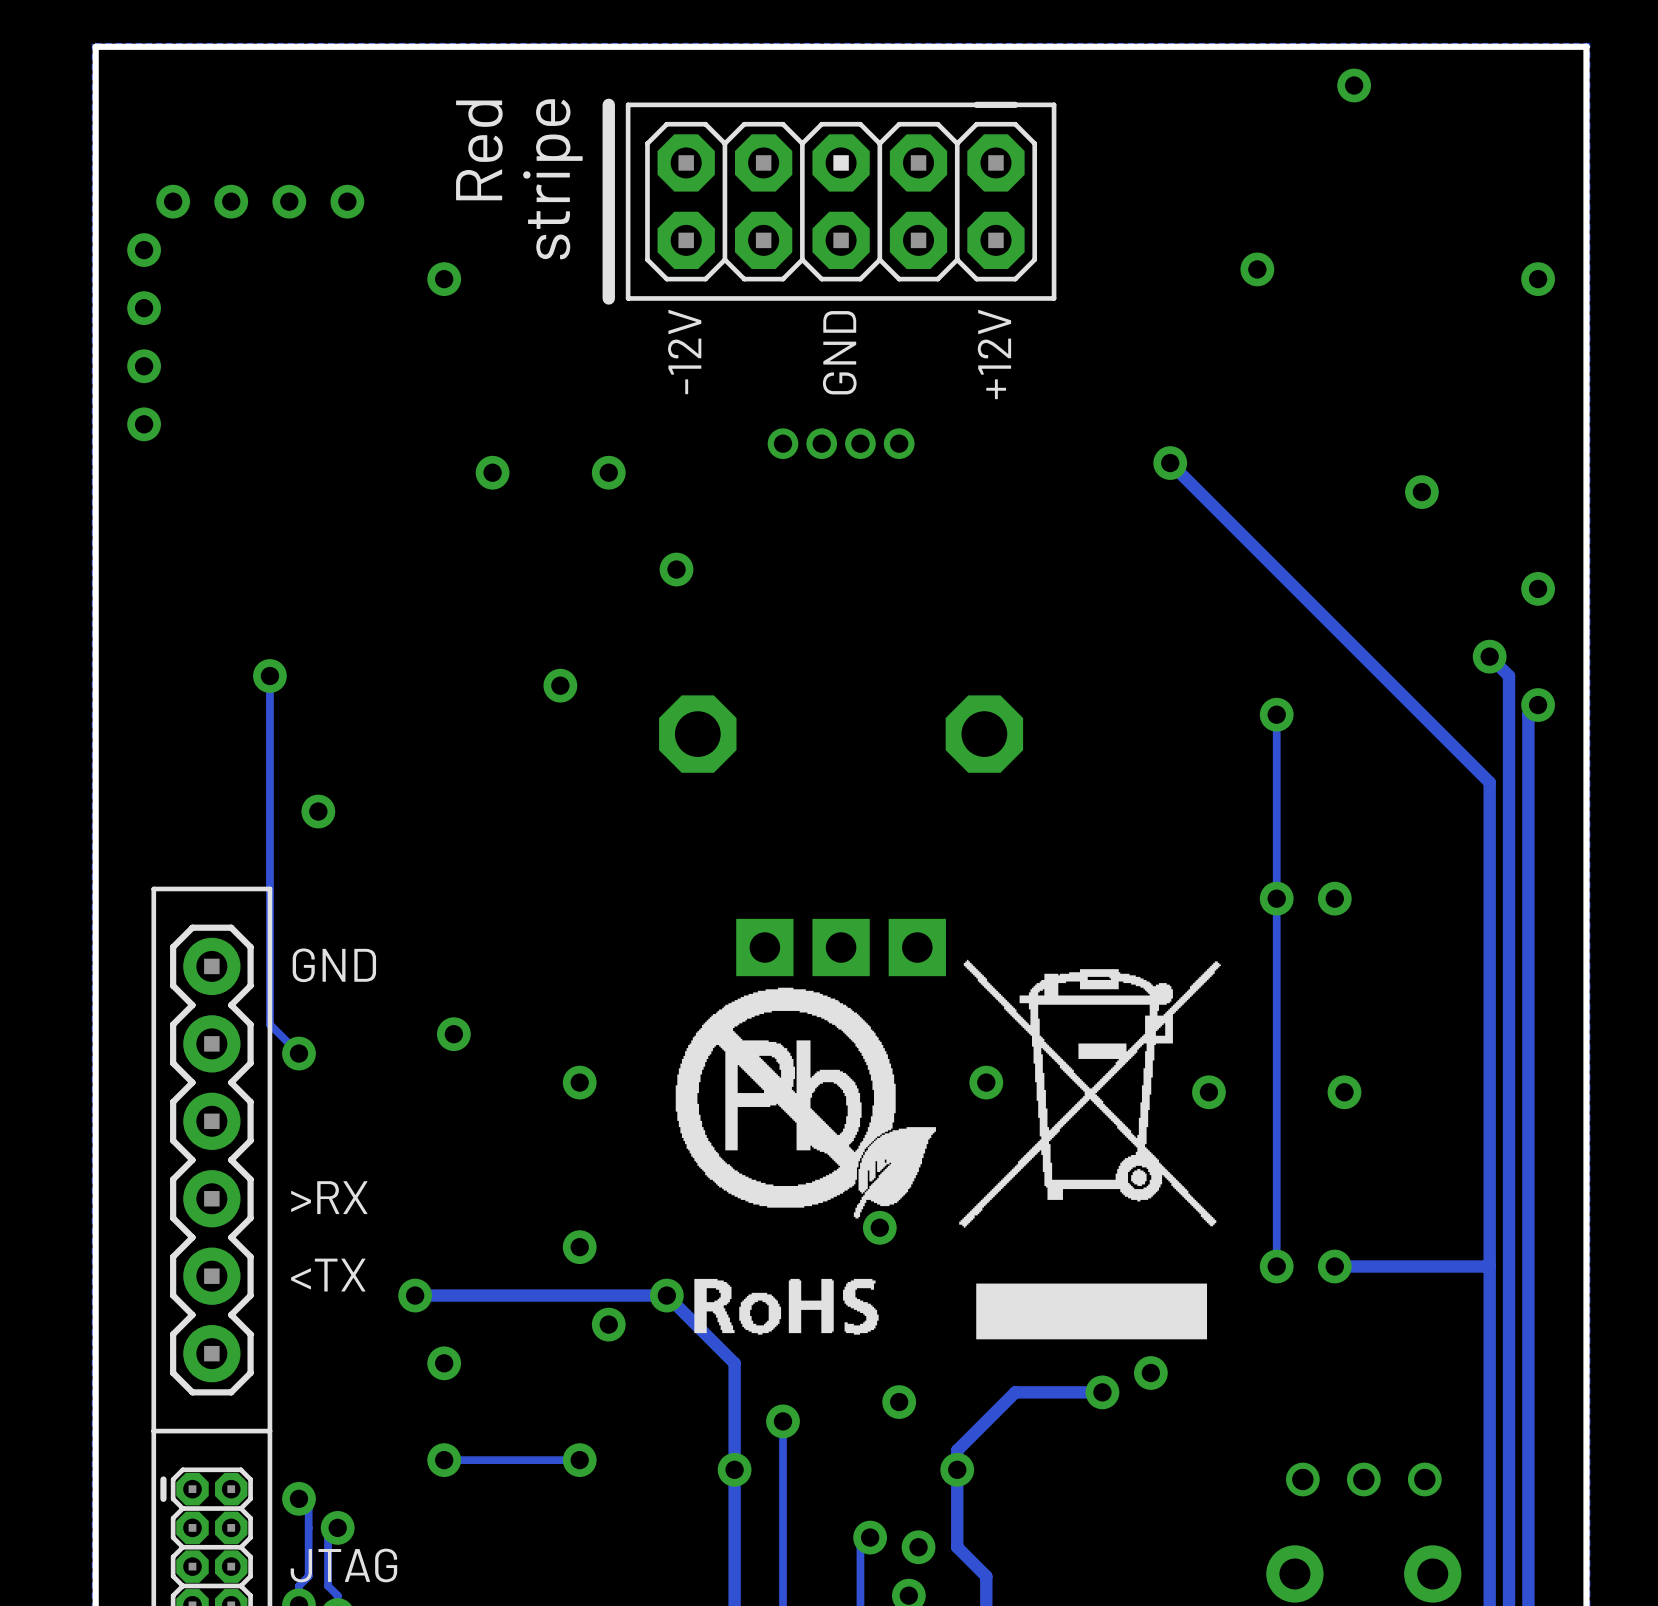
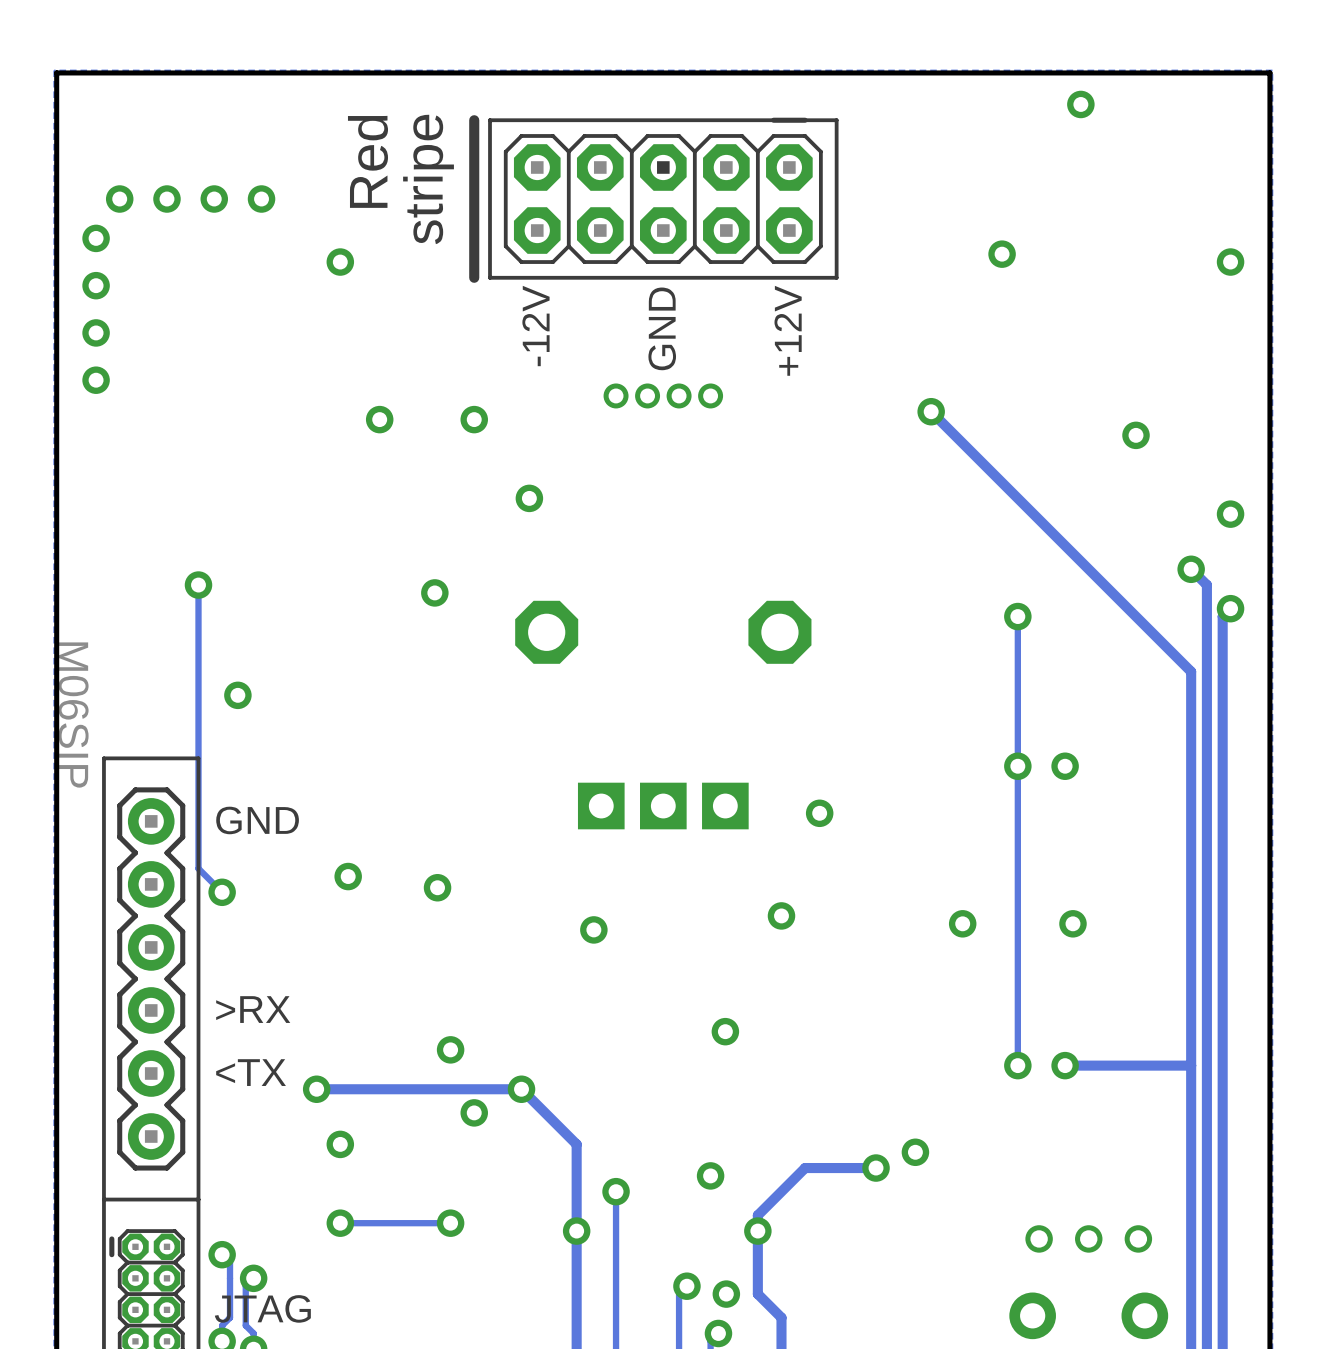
part value: none -> M06SIP (73, 715)
via: none -> (819, 813)
drawing: [675, 959, 1221, 1340] -> none
via position: (579, 1082) -> (437, 887)
via: none -> (593, 929)
via position: (879, 1227) -> (725, 1031)

